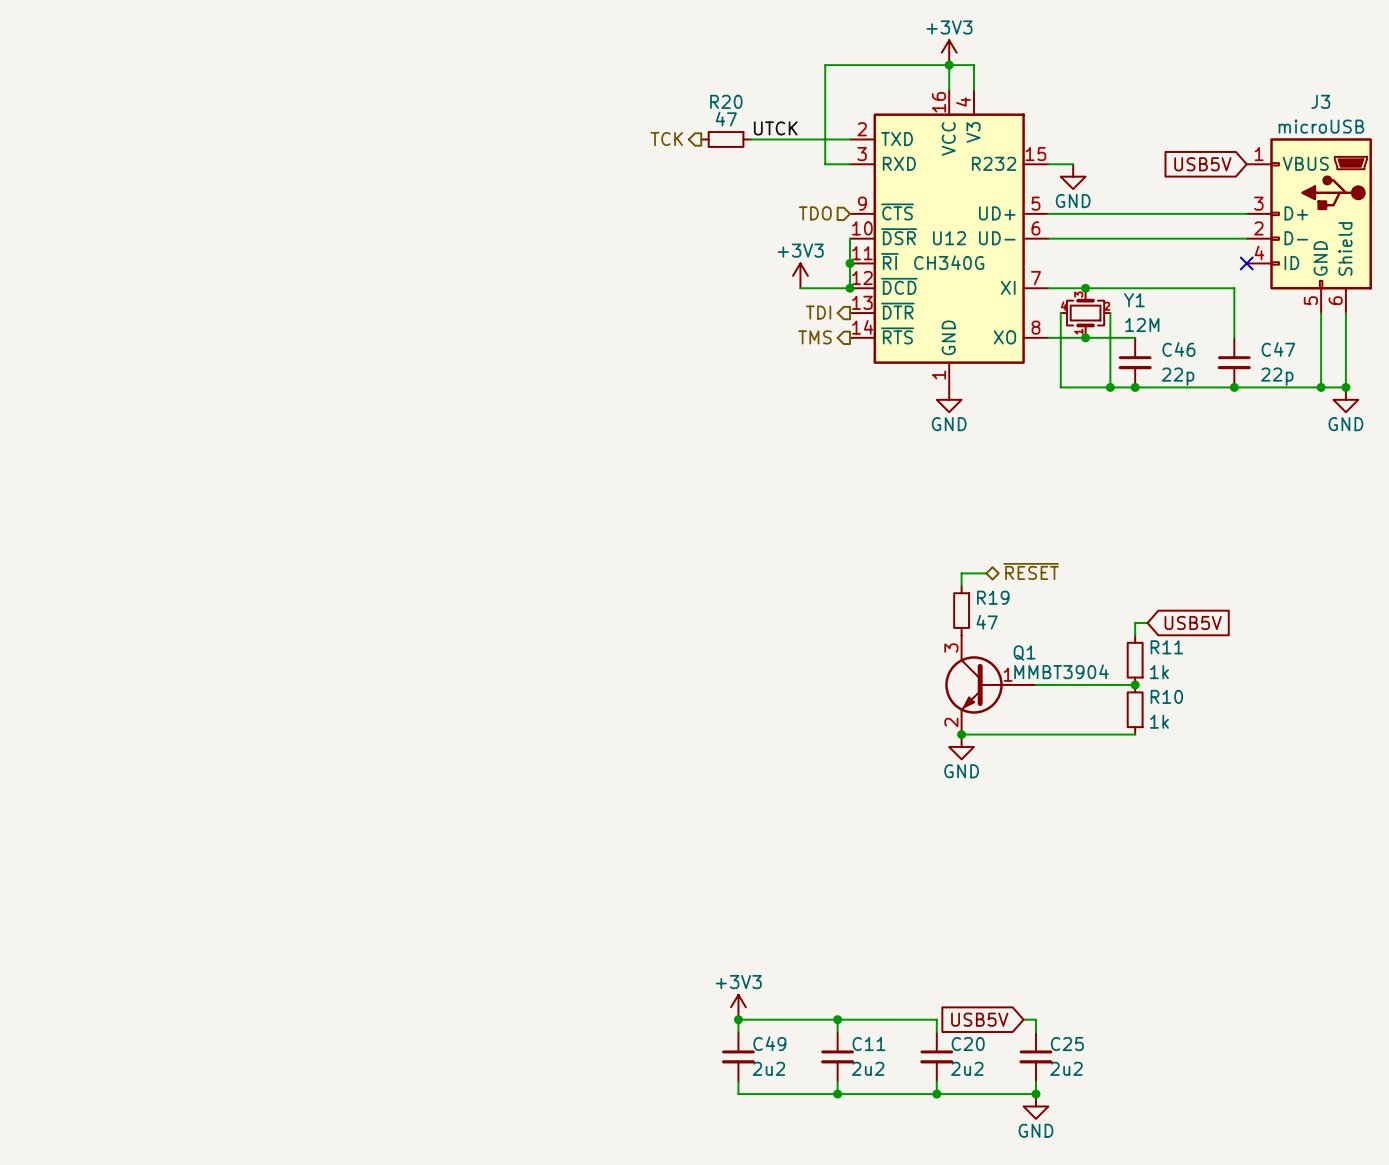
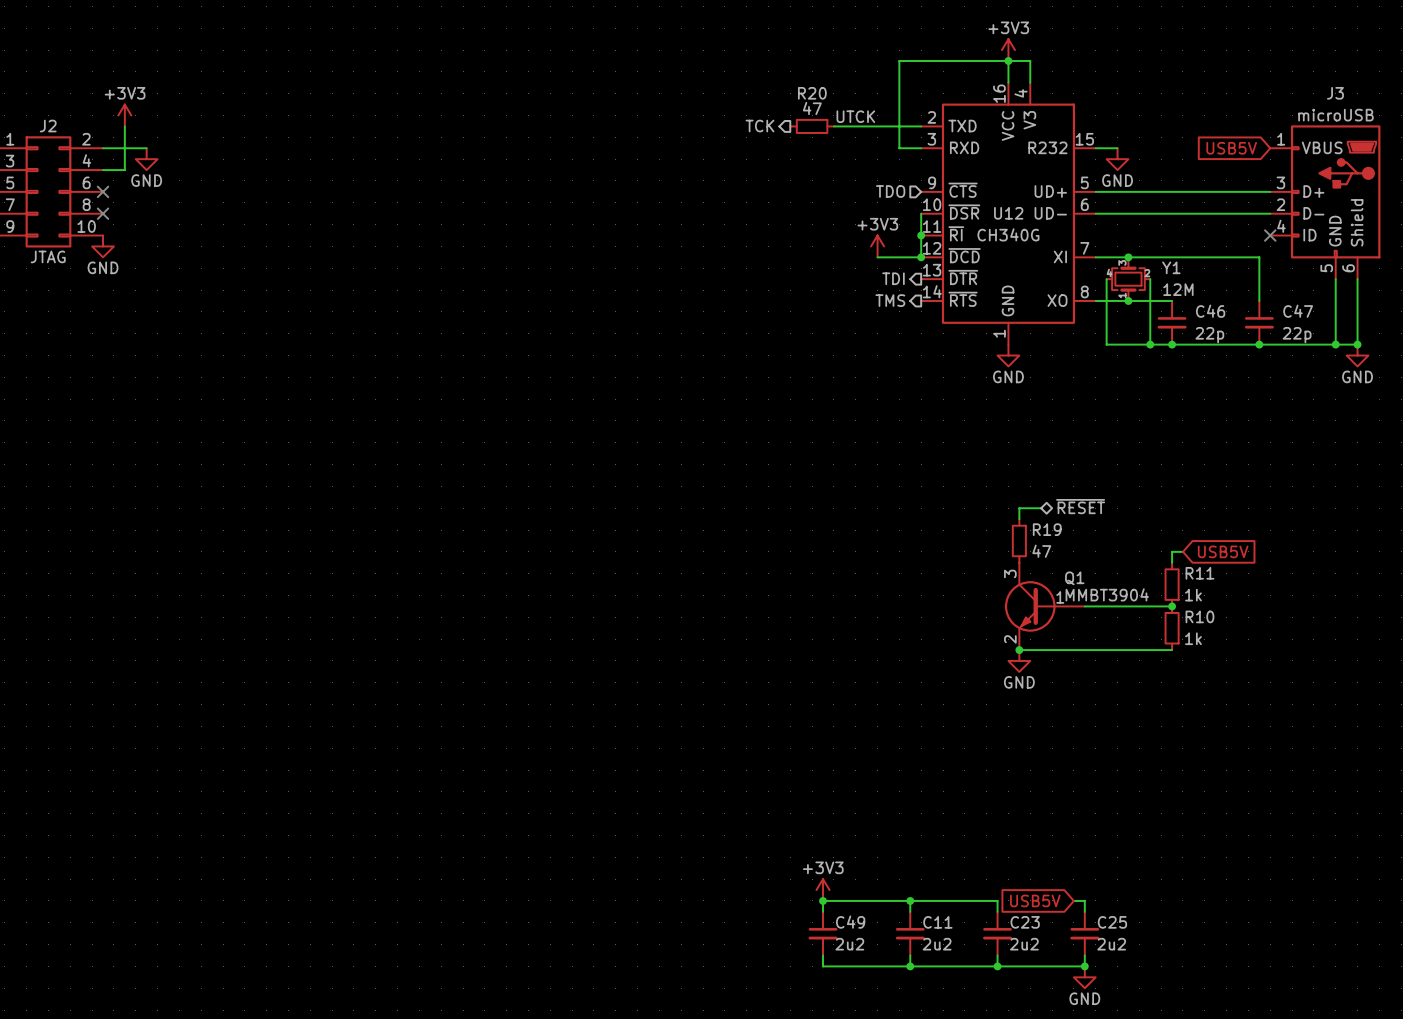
C20 name: C20 (968, 1044) -> C23 (1025, 922)

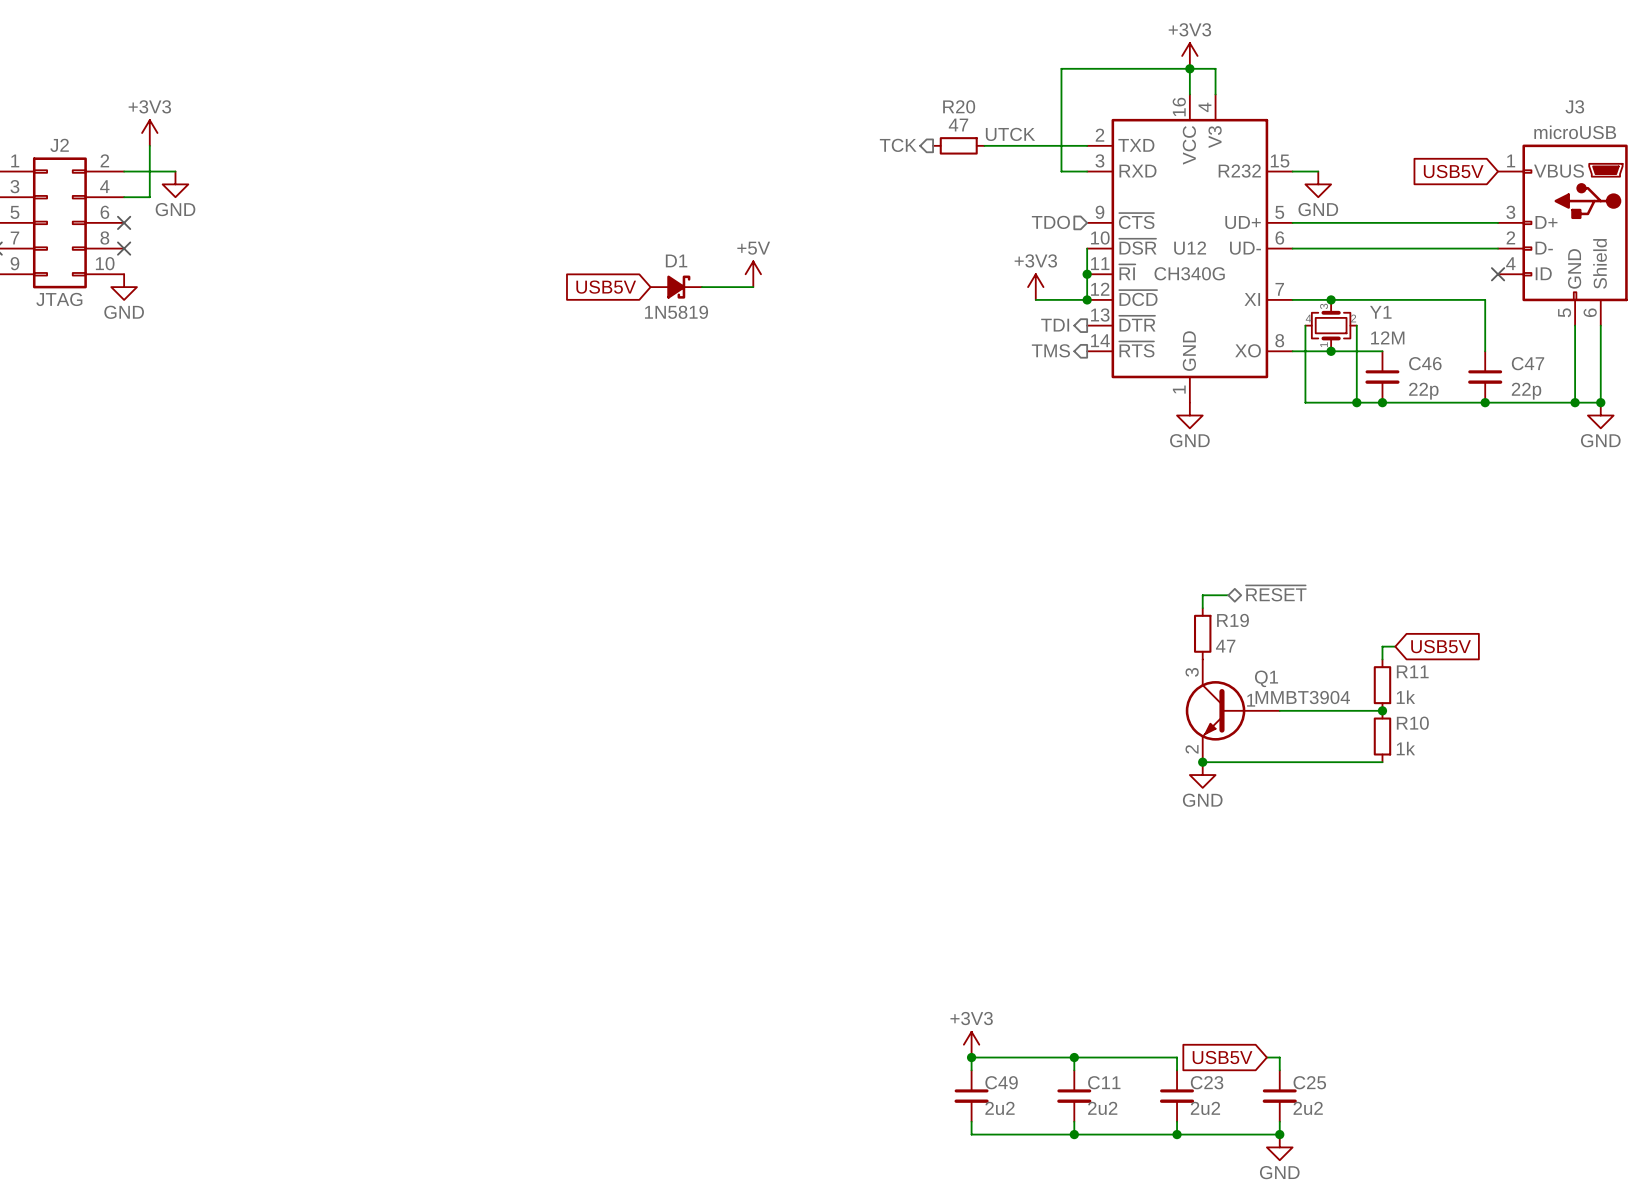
power symbol: none -> +5V (753, 274)
global label: none -> USB5V (606, 287)
D1: none -> 1N5819 (676, 287)
wire: none -> (701, 287) (753, 287)

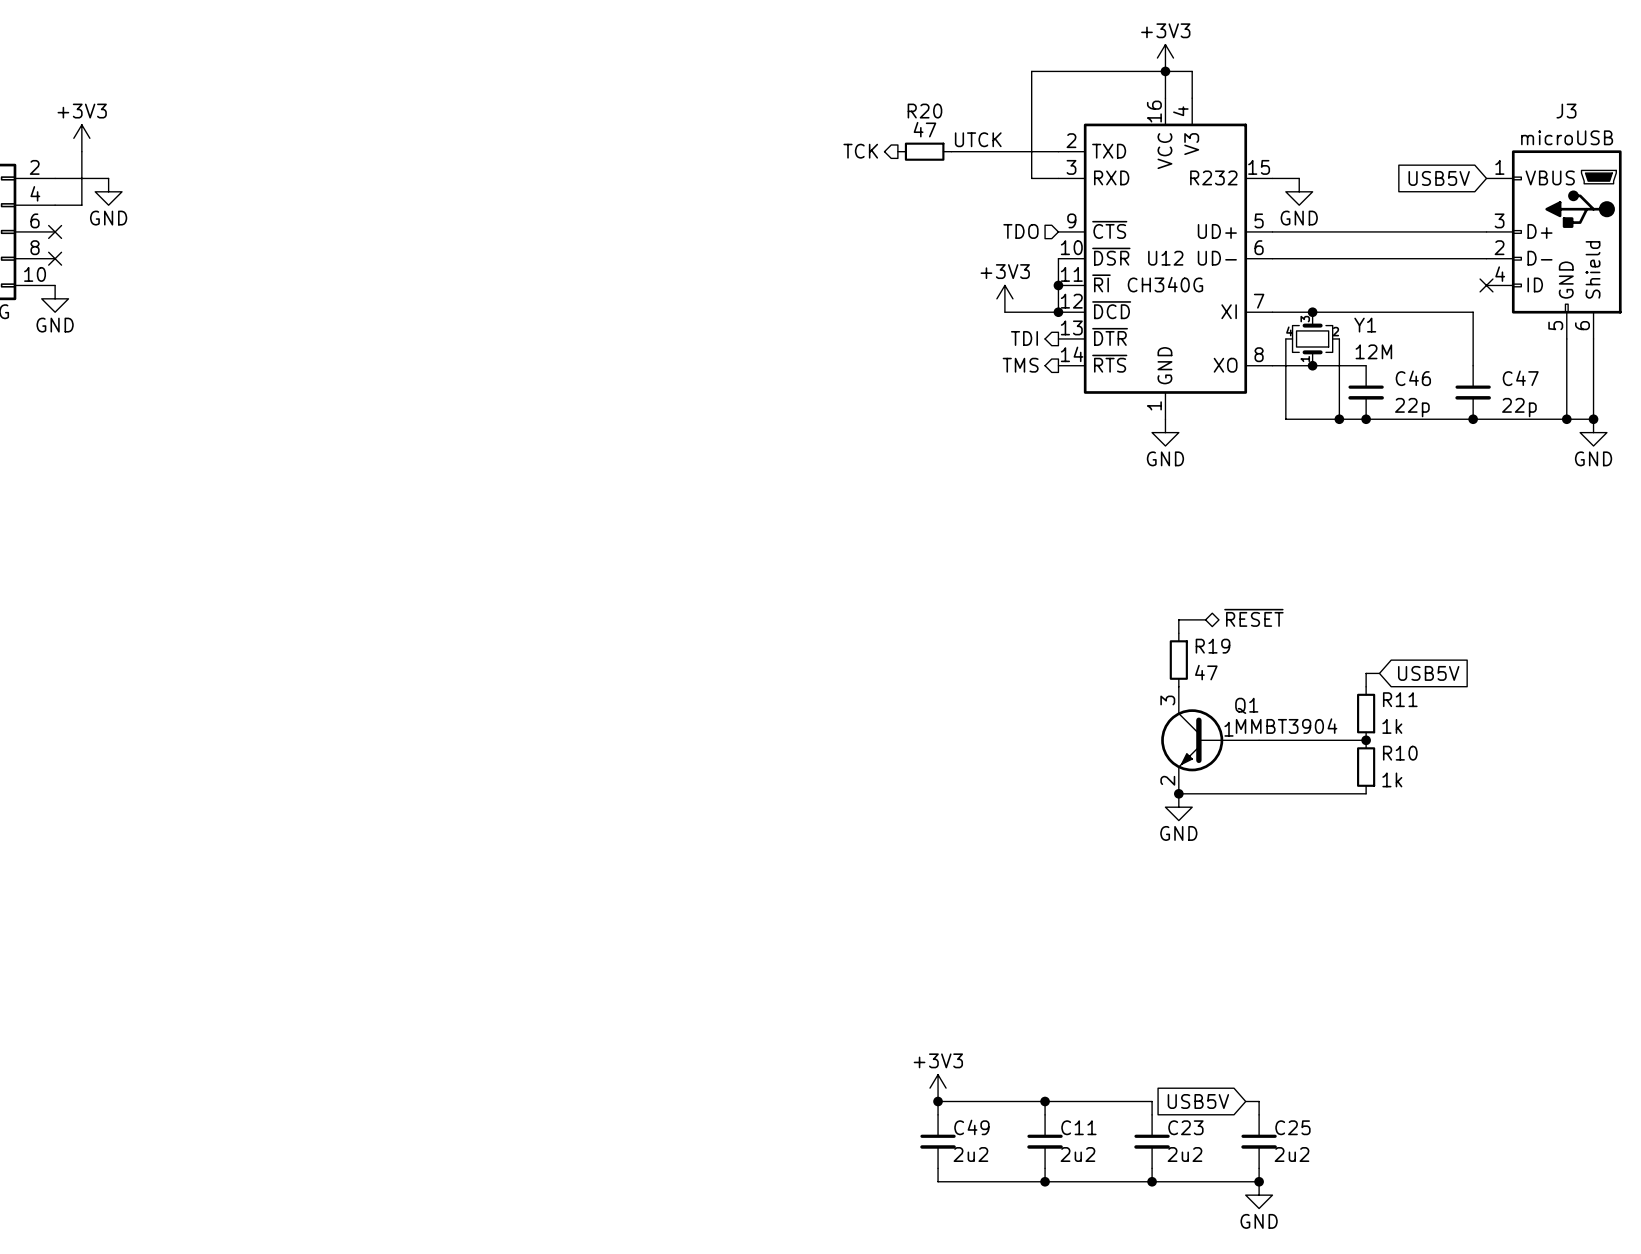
power symbol: +5V (753, 274) -> none
global label: USB5V (606, 287) -> none
D1: 1N5819 (676, 287) -> none
wire: (701, 287) (753, 287) -> none

